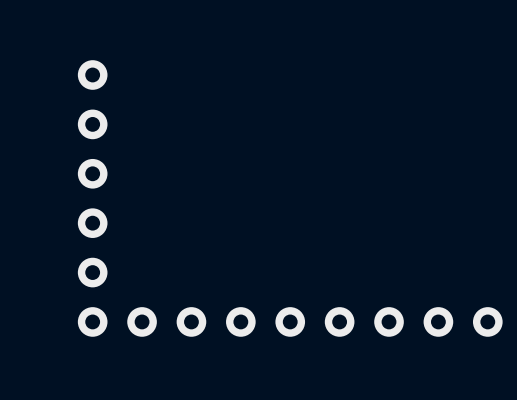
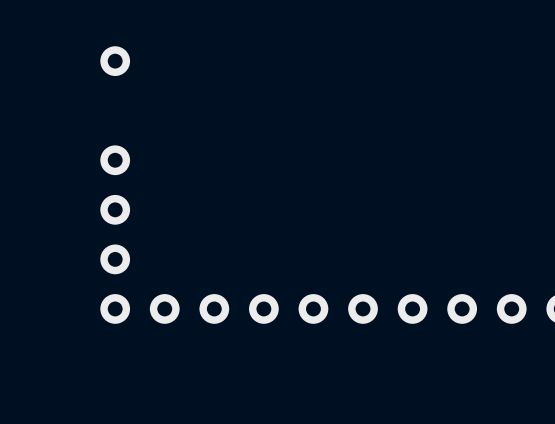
via: (92, 124) -> none

